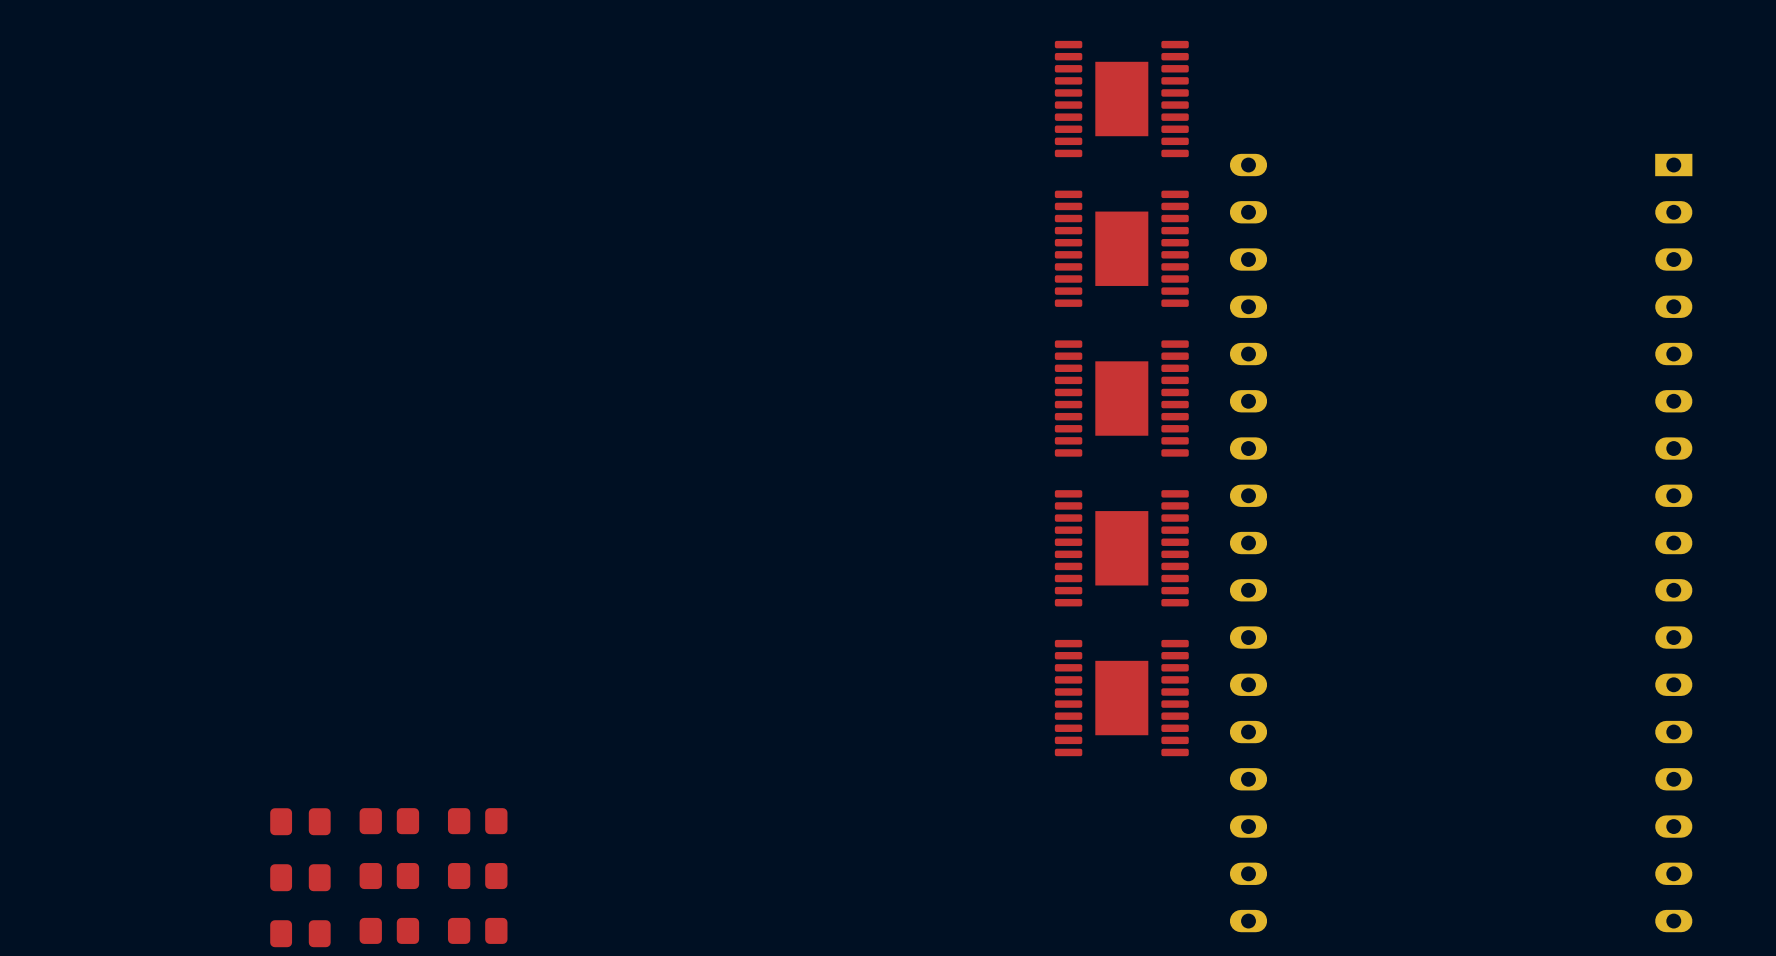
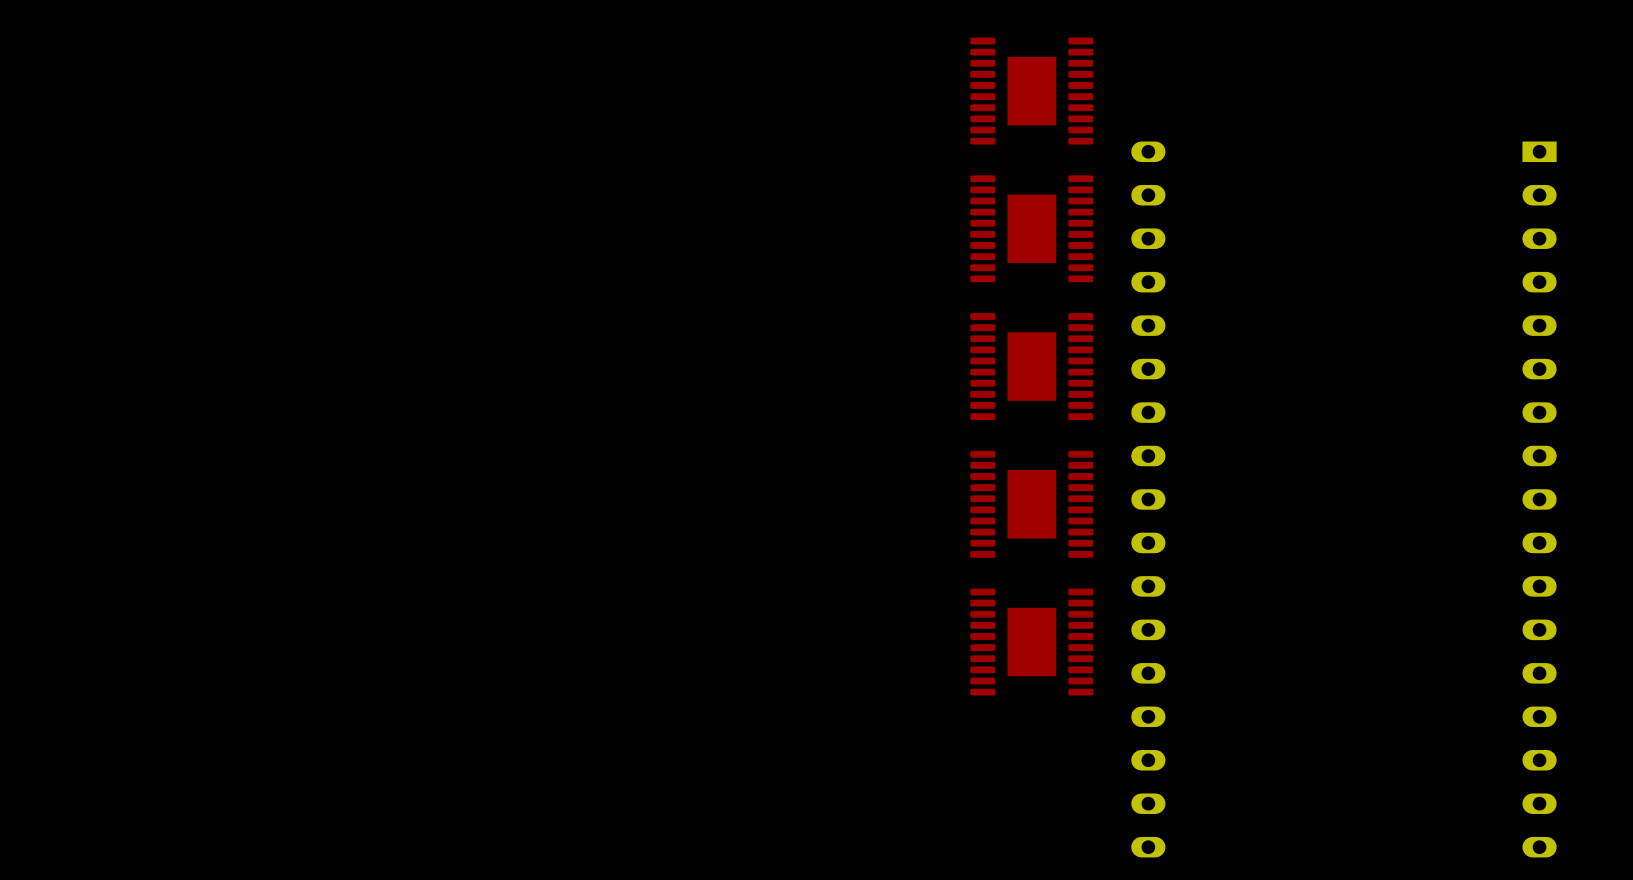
part: (300, 821) -> none
part: (389, 821) -> none
part: (477, 821) -> none
part: (389, 876) -> none
part: (477, 876) -> none
part: (300, 877) -> none
part: (389, 930) -> none
part: (477, 930) -> none
part: (300, 933) -> none

